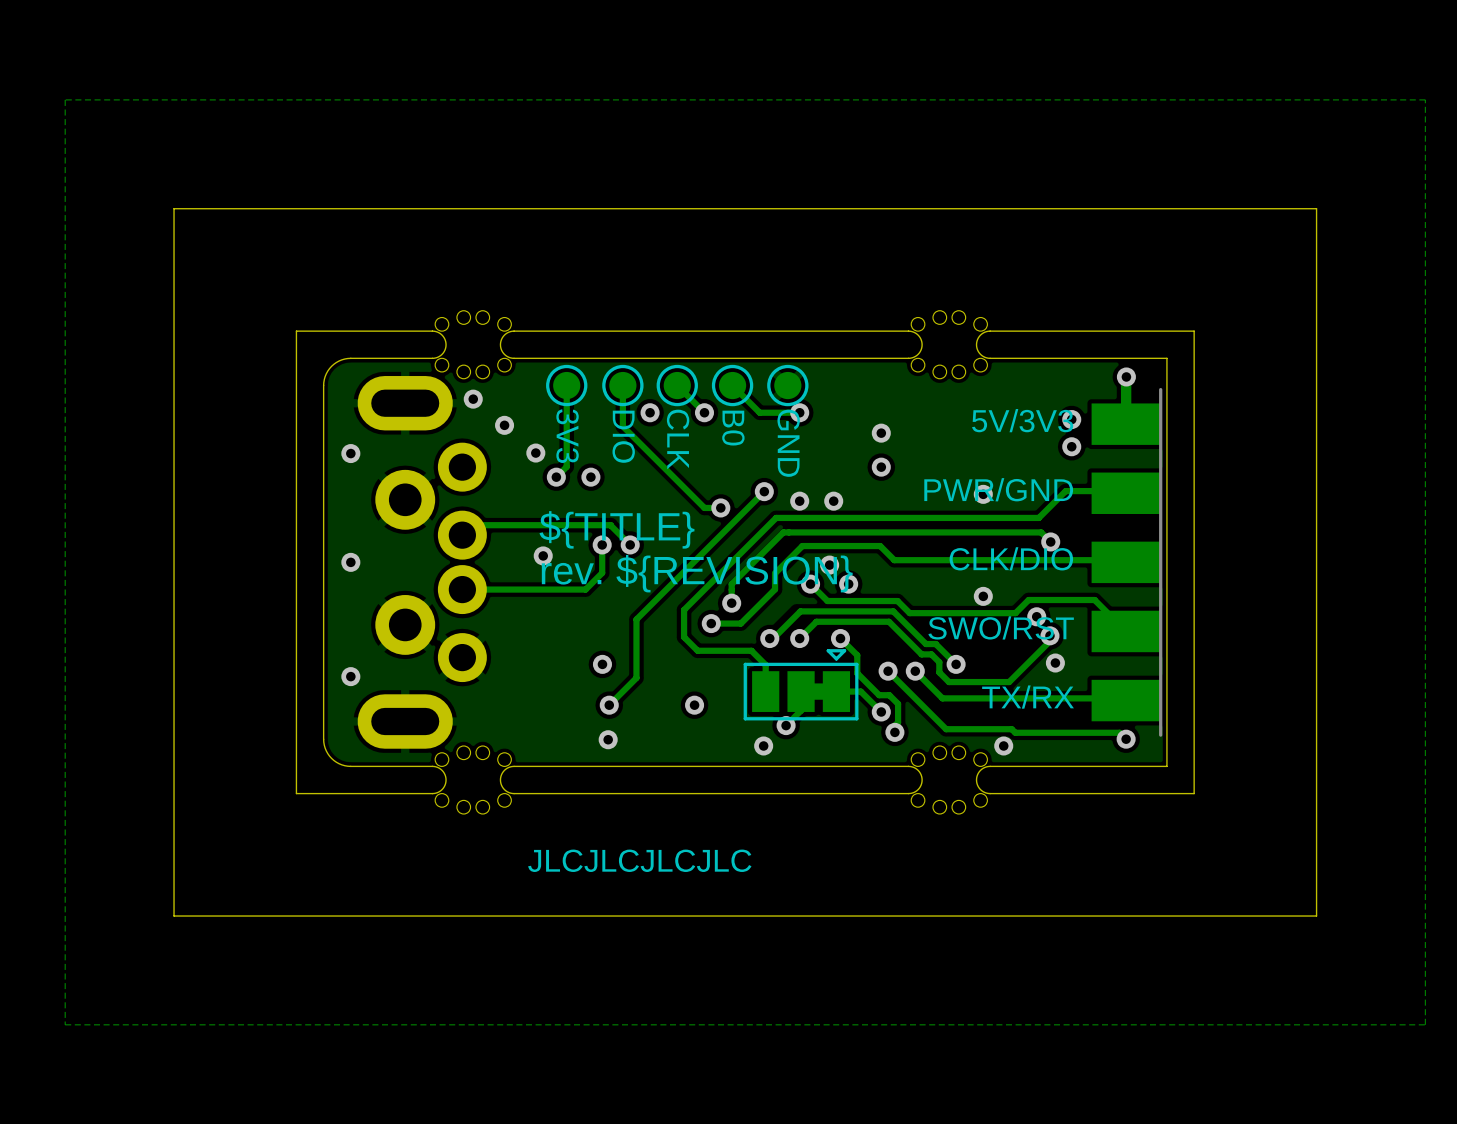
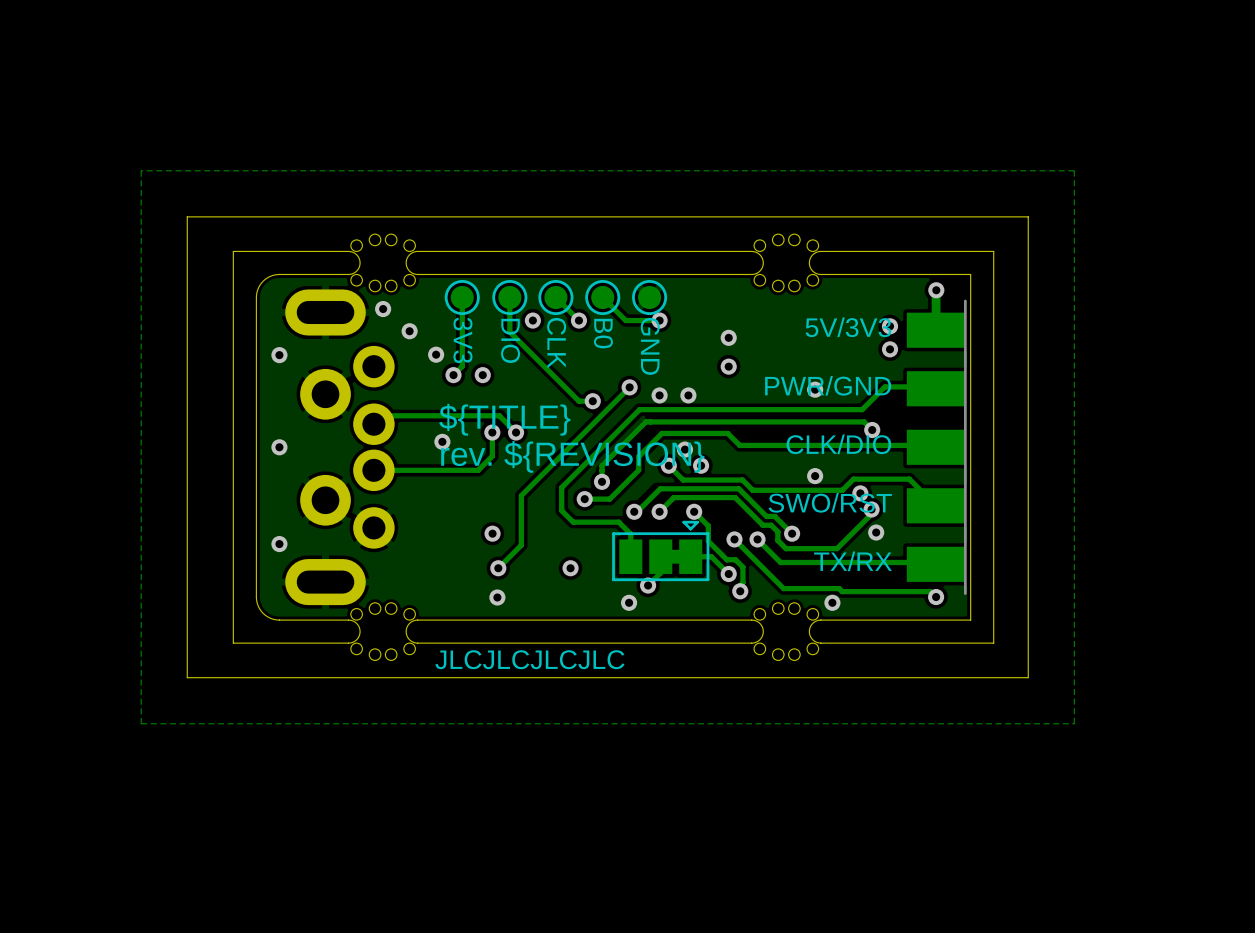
zone outline: (1425, 99) (1425, 1024) (65, 1024) (65, 99) (1425, 99) -> (1074, 170) (1074, 723) (141, 723) (141, 170) (1074, 170)
board edge: (1316, 208) (174, 208) (174, 916) (1316, 916) (1316, 208) -> (1028, 216) (1028, 677) (187, 677) (187, 216) (1028, 216)
text position: JLCJLCJLCJLC (639, 860) -> JLCJLCJLCJLC (529, 659)

